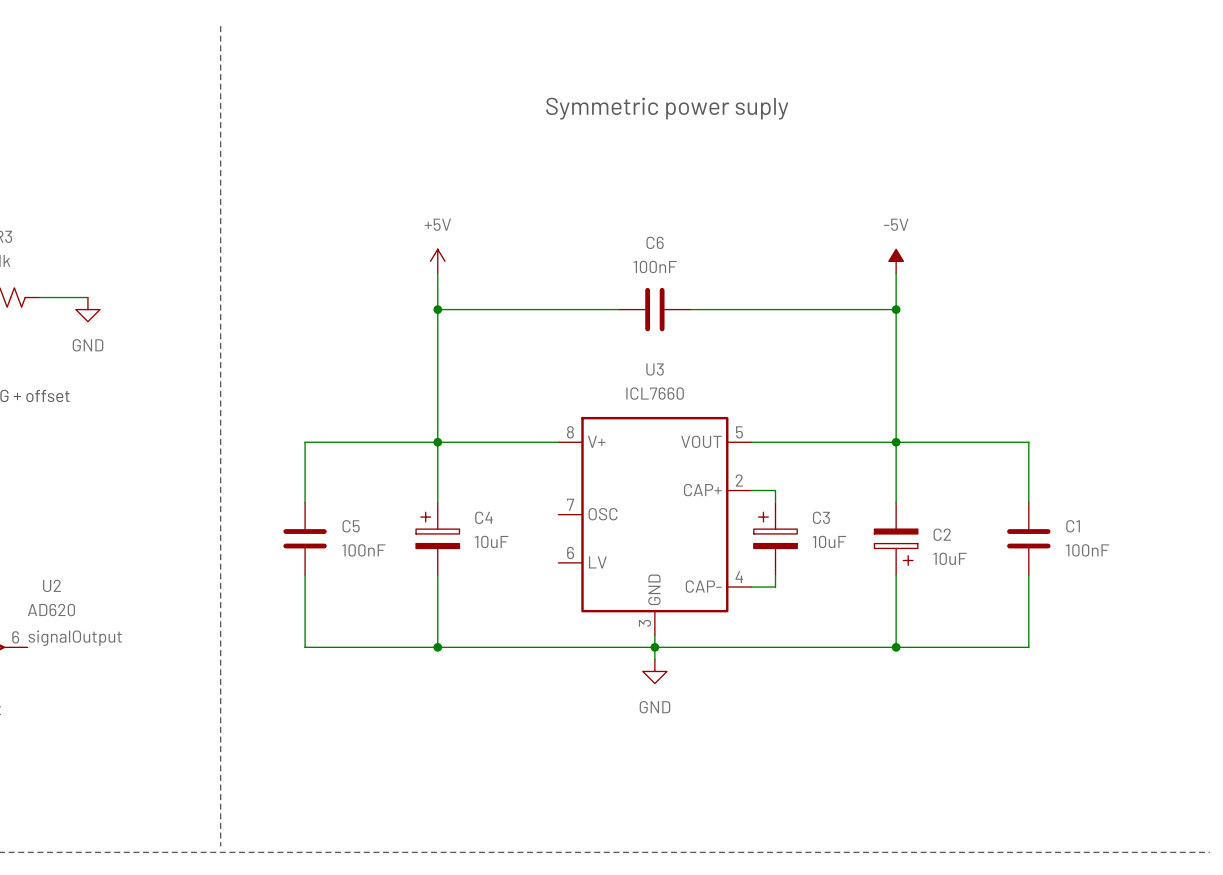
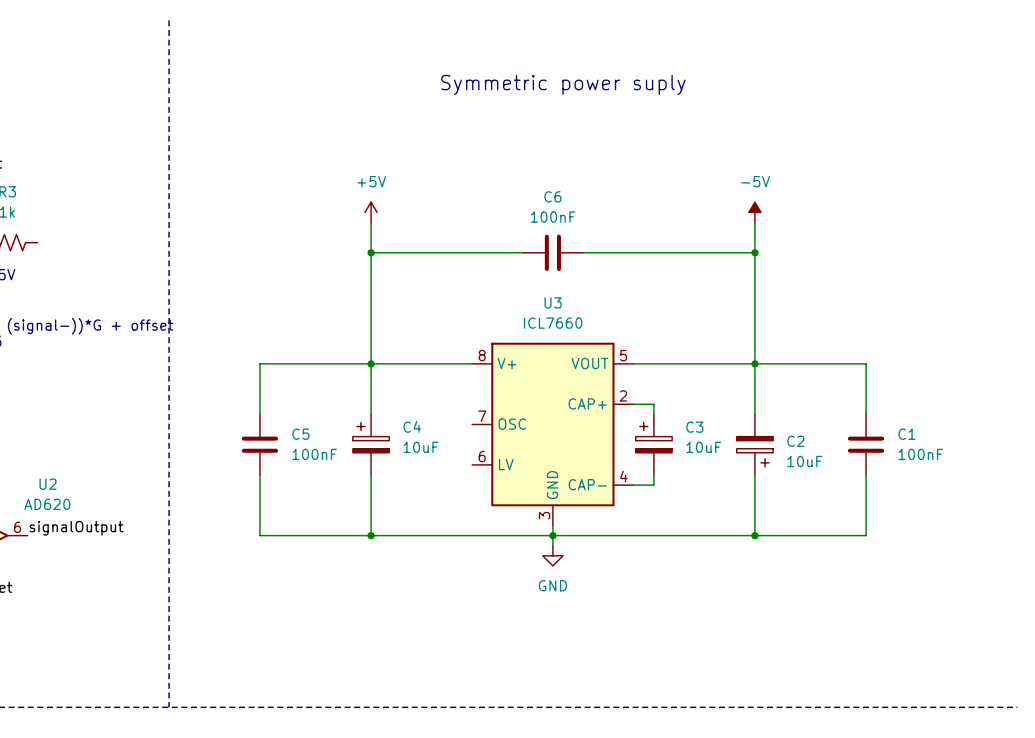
line: (220, 26) (220, 846) -> (169, 20) (169, 707)
wire: (39, 297) (87, 297) -> none
power symbol: GND (87, 309) -> none

